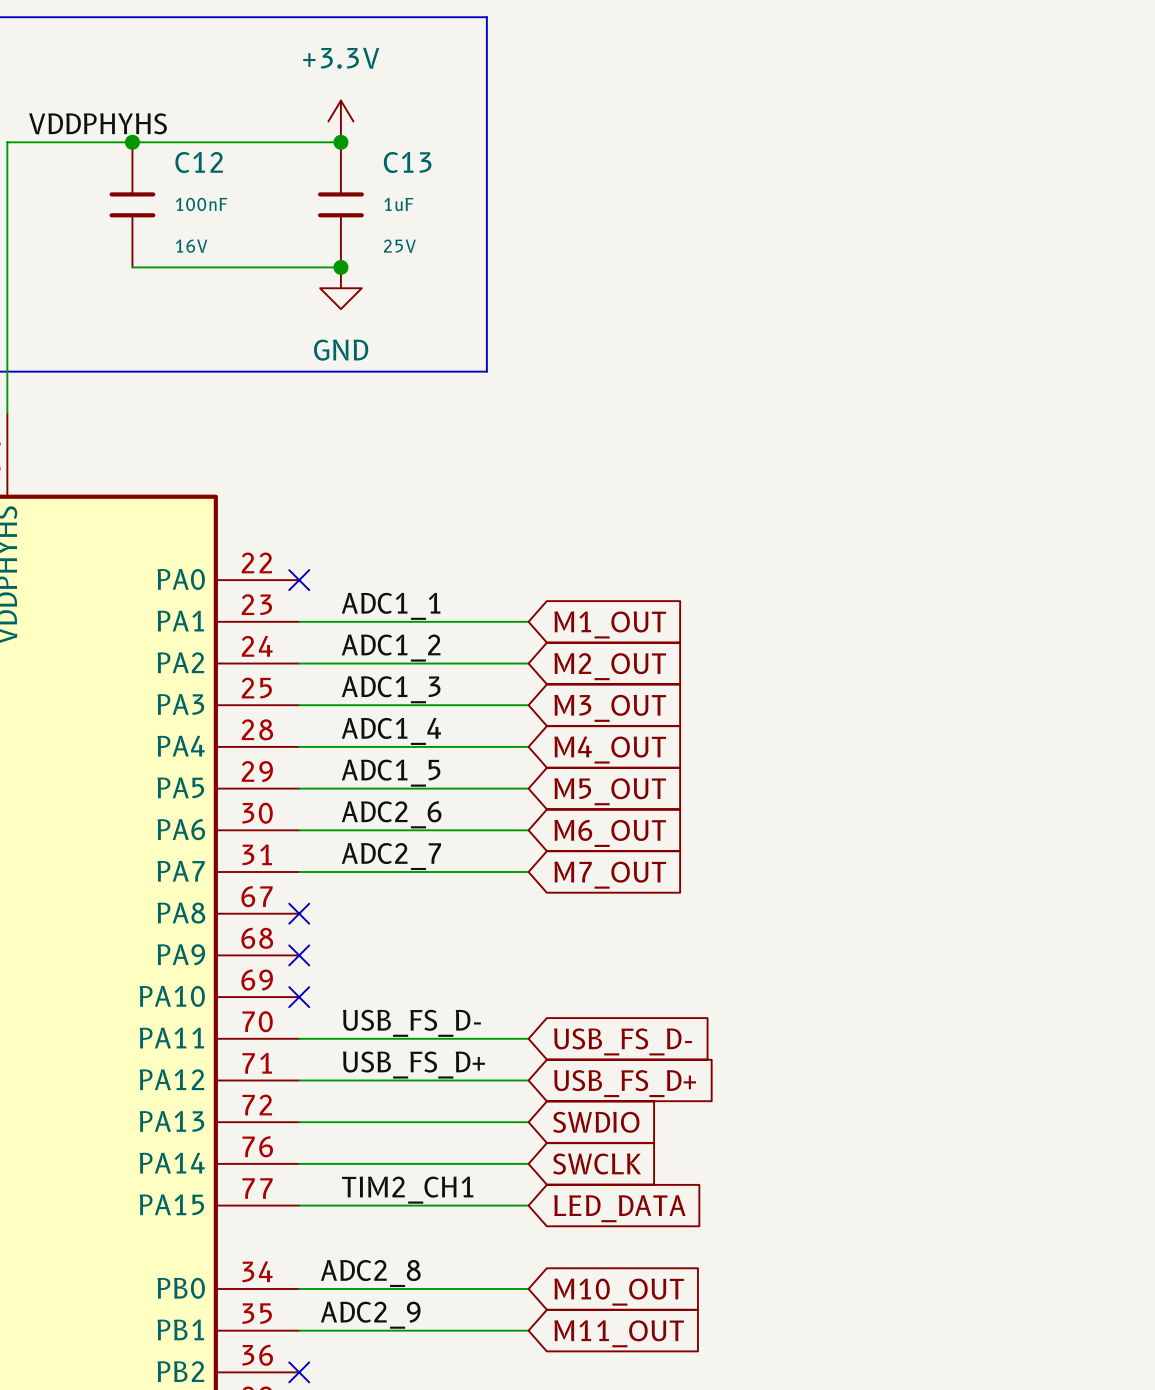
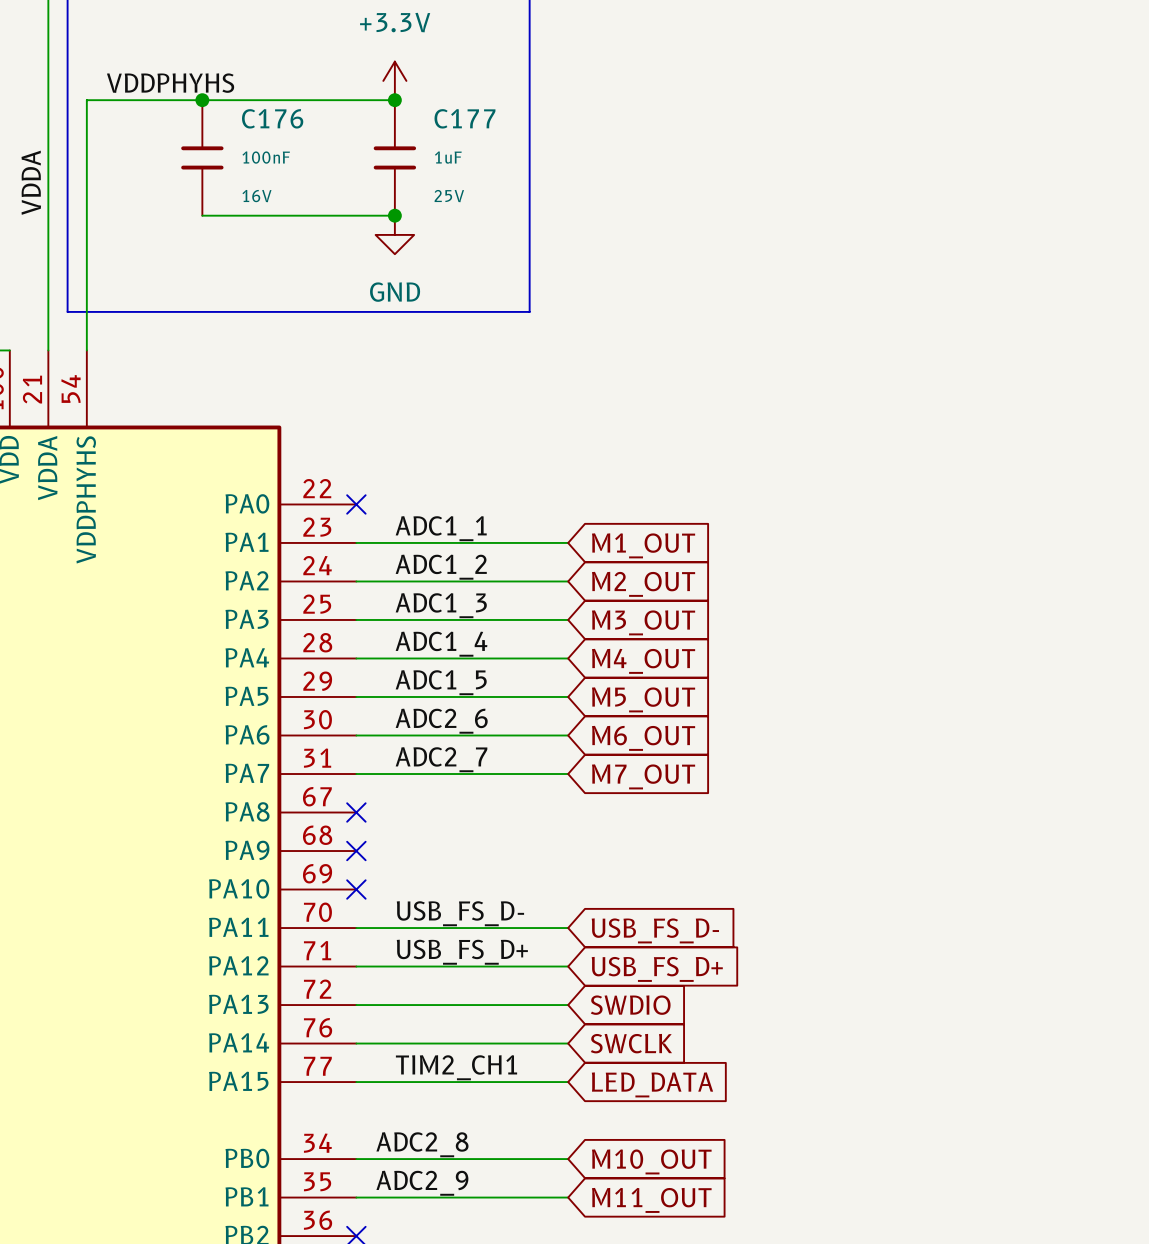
C12 name: C12 (199, 162) -> C176 (272, 118)
C13 name: C13 (407, 162) -> C177 (464, 118)

